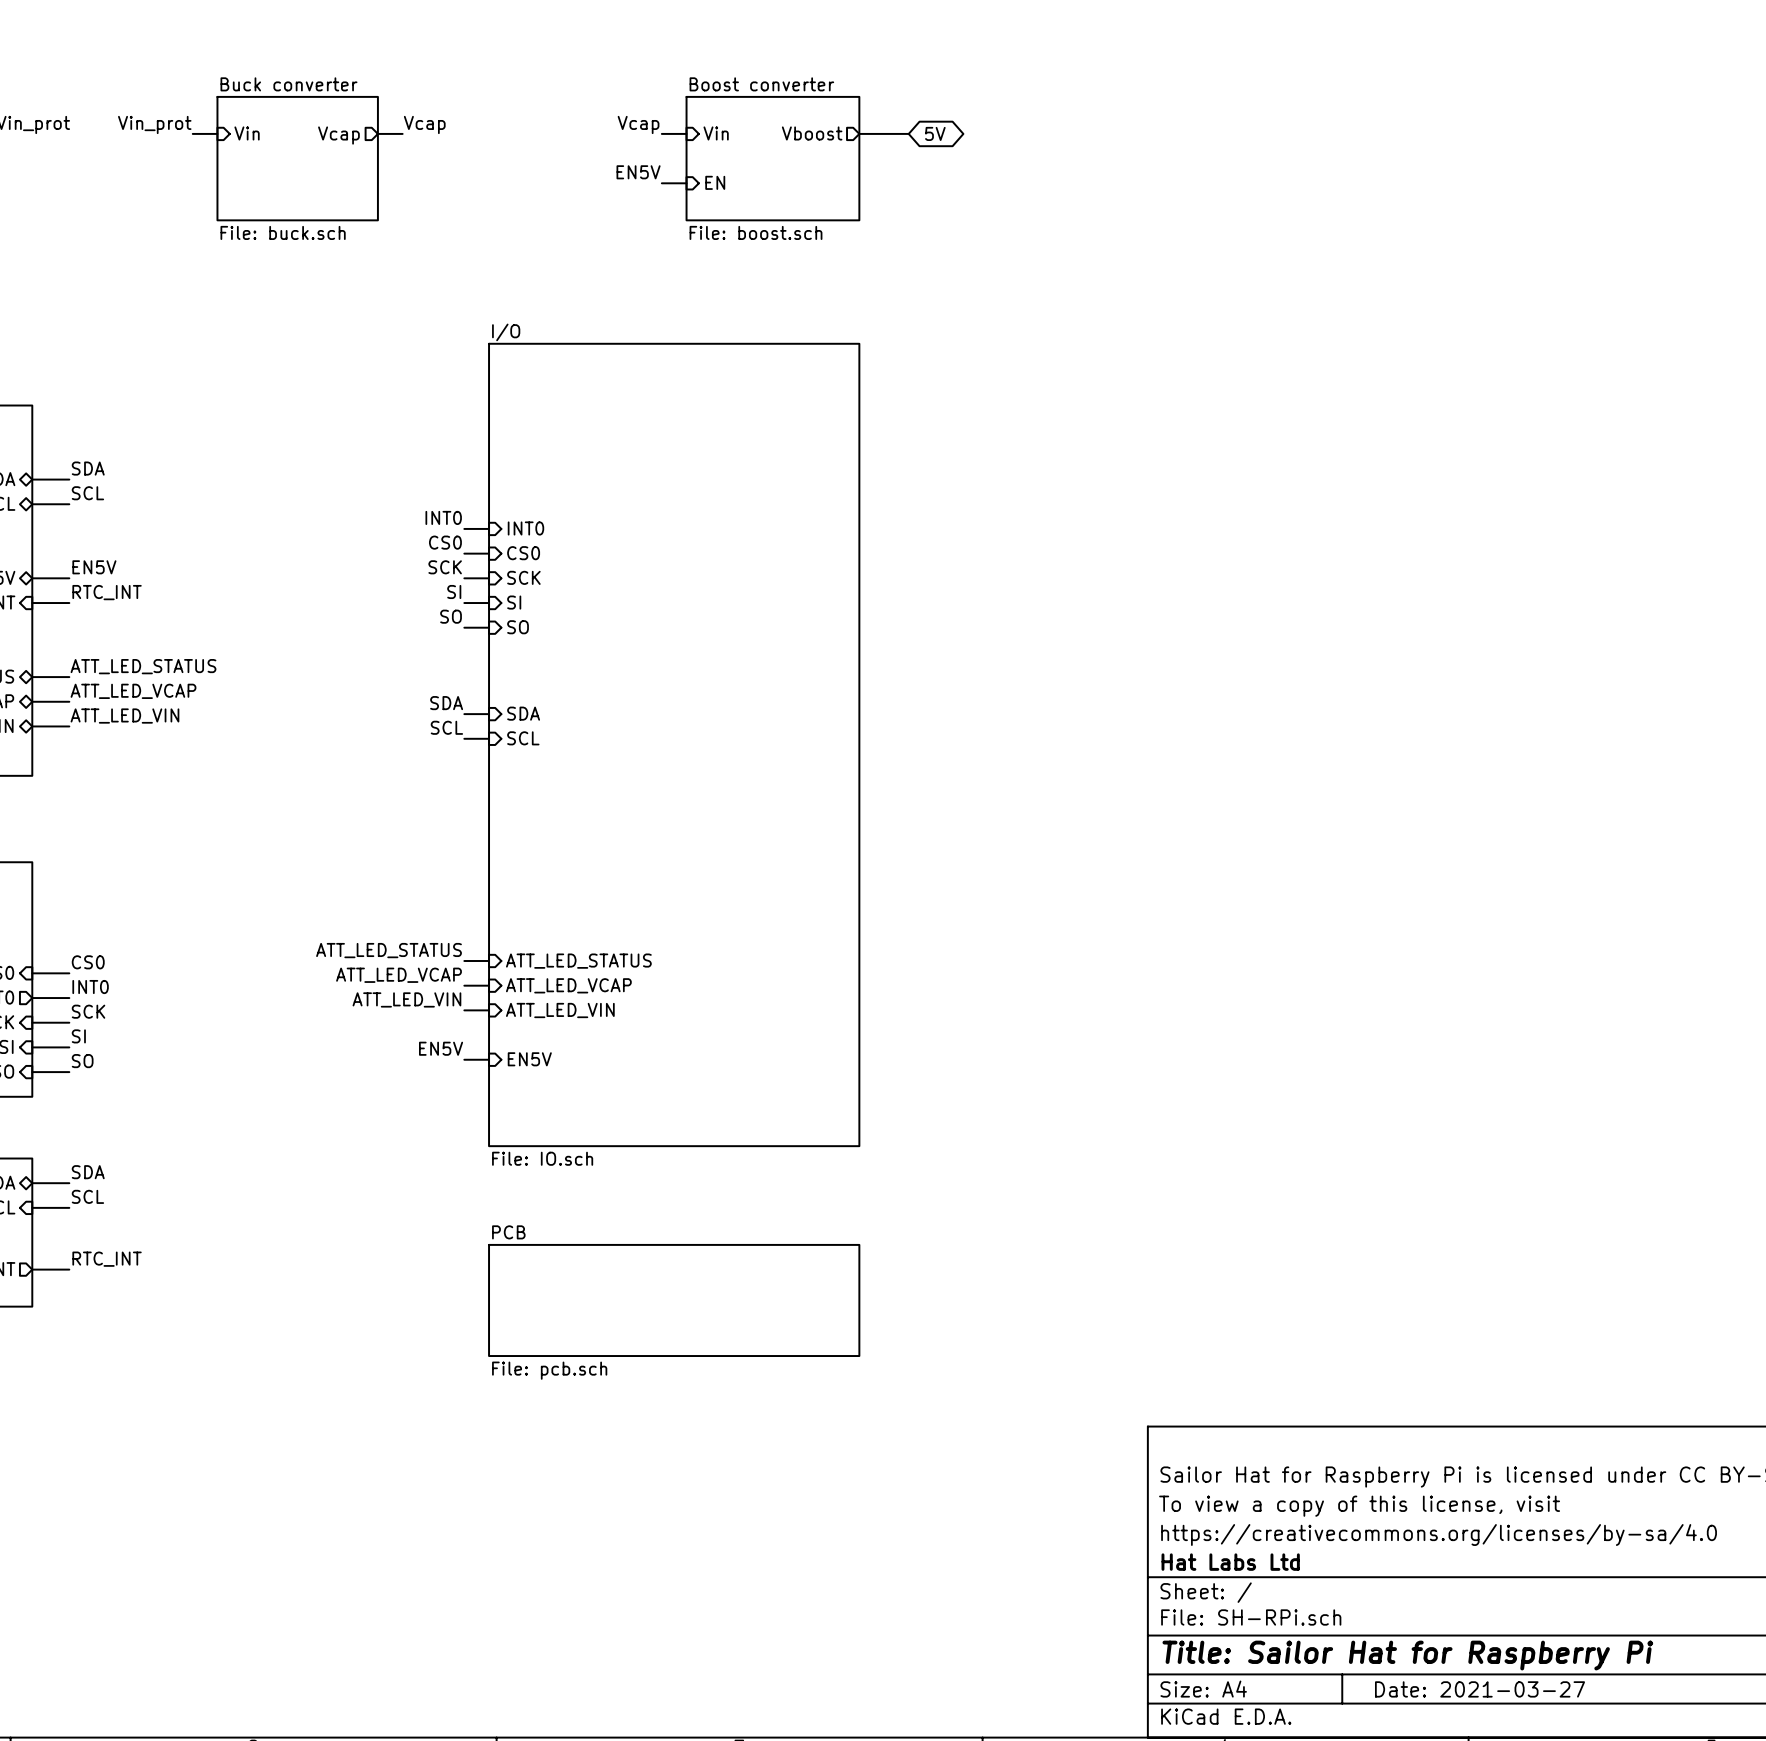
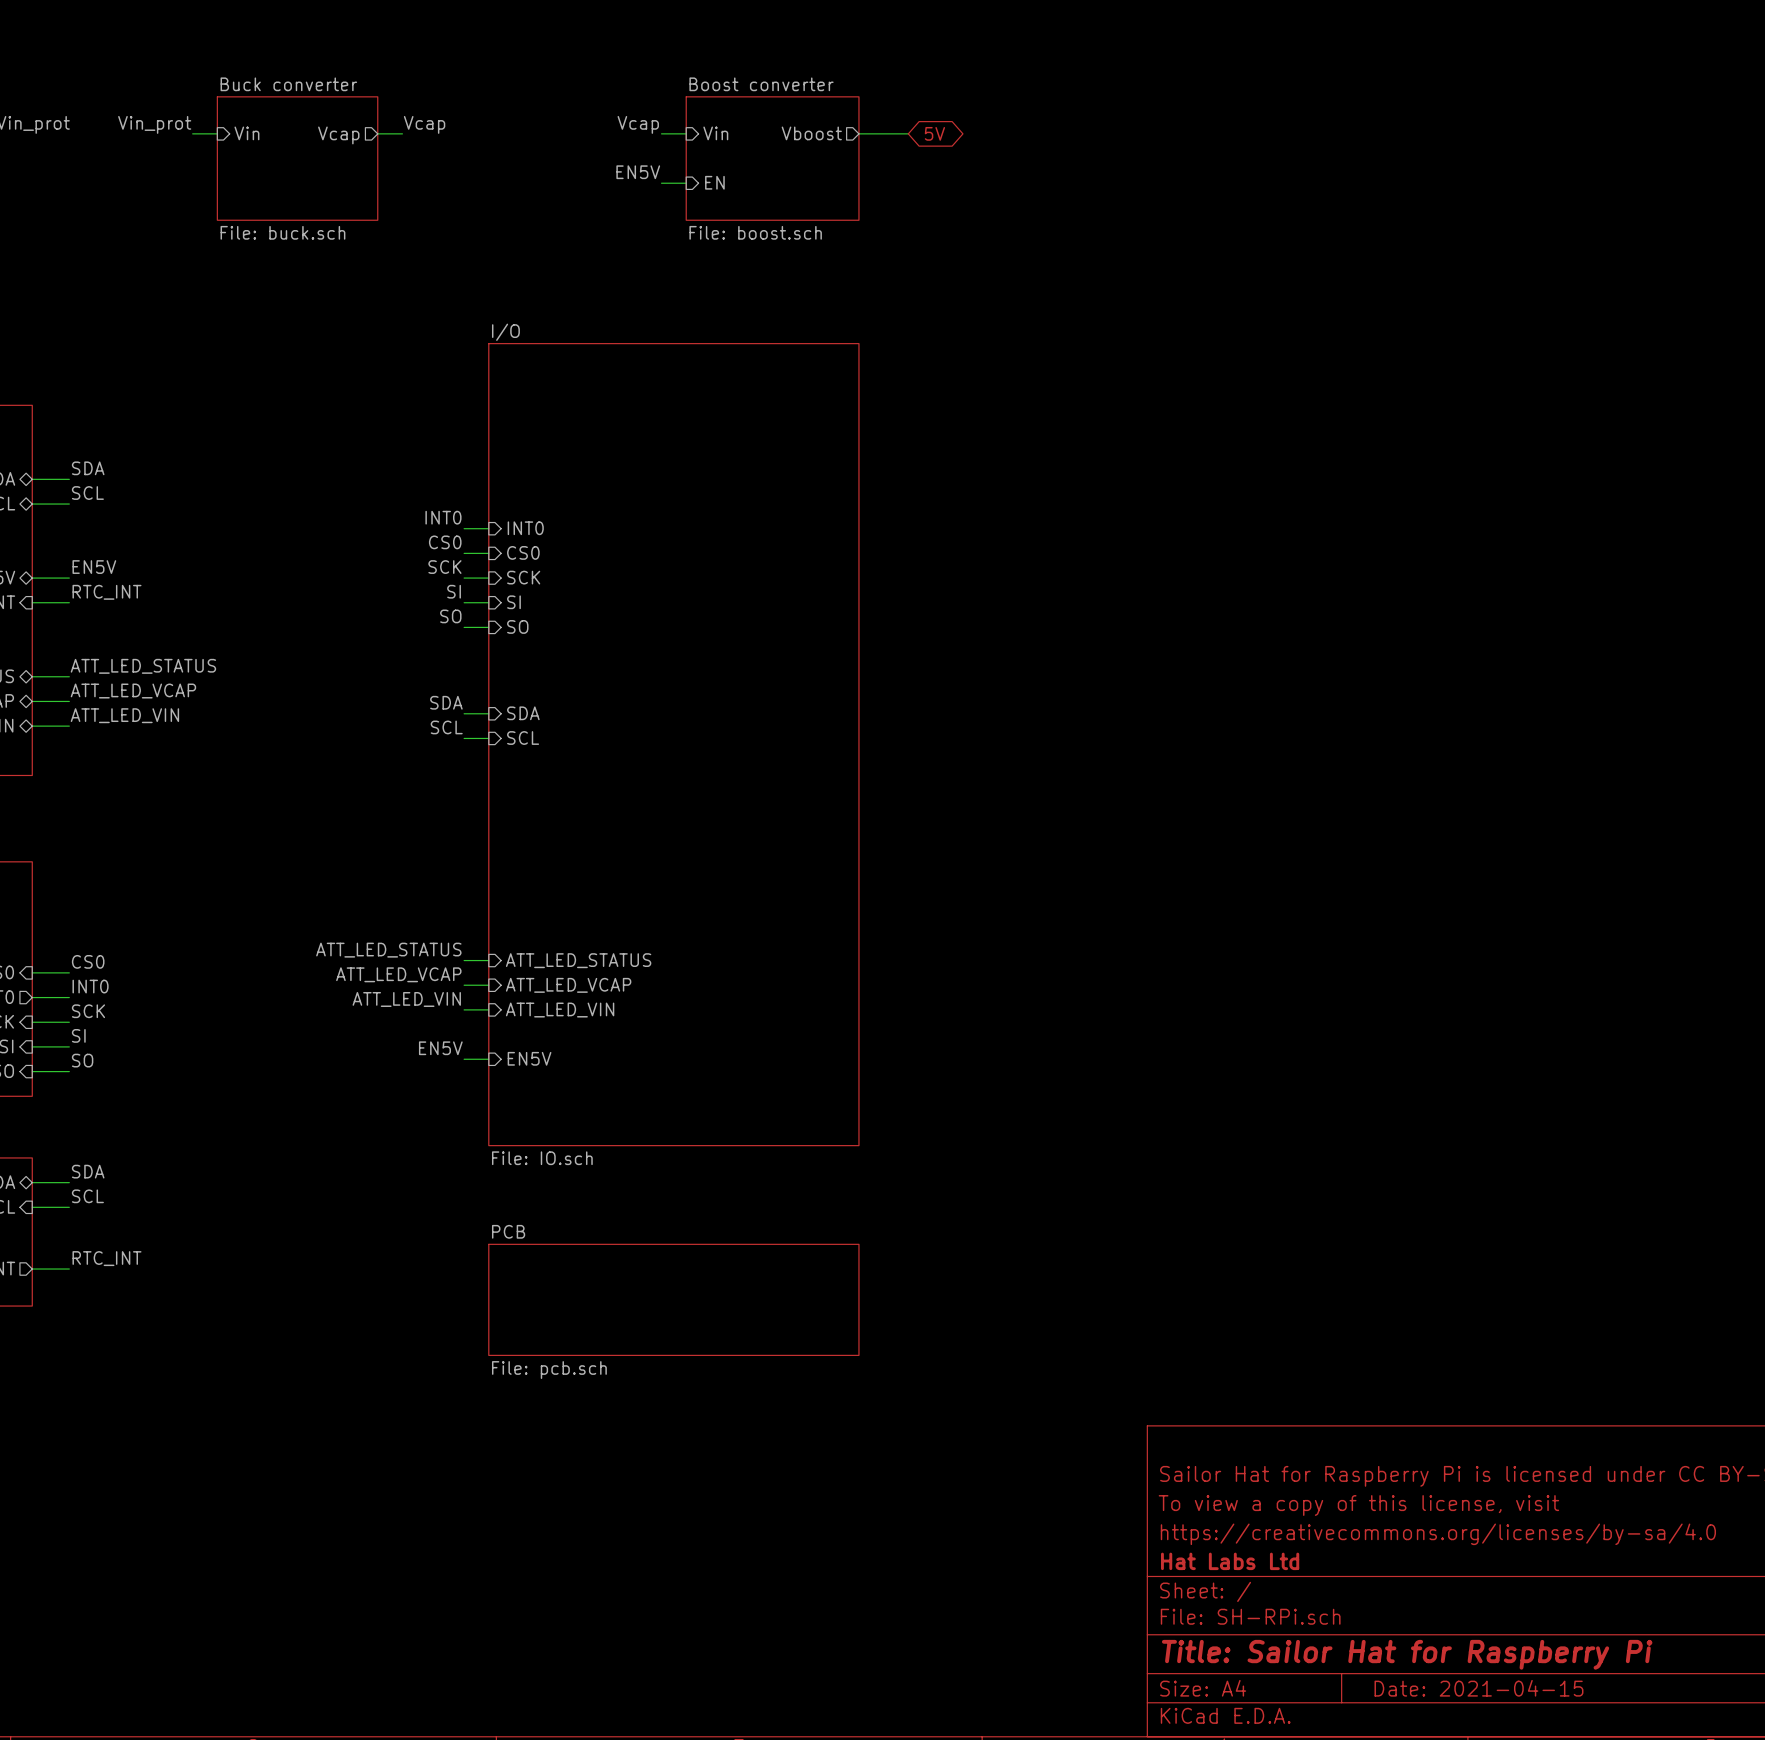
title block: Date: 2021-03-27 (1480, 1689) -> Date: 2021-04-15 (1478, 1688)

